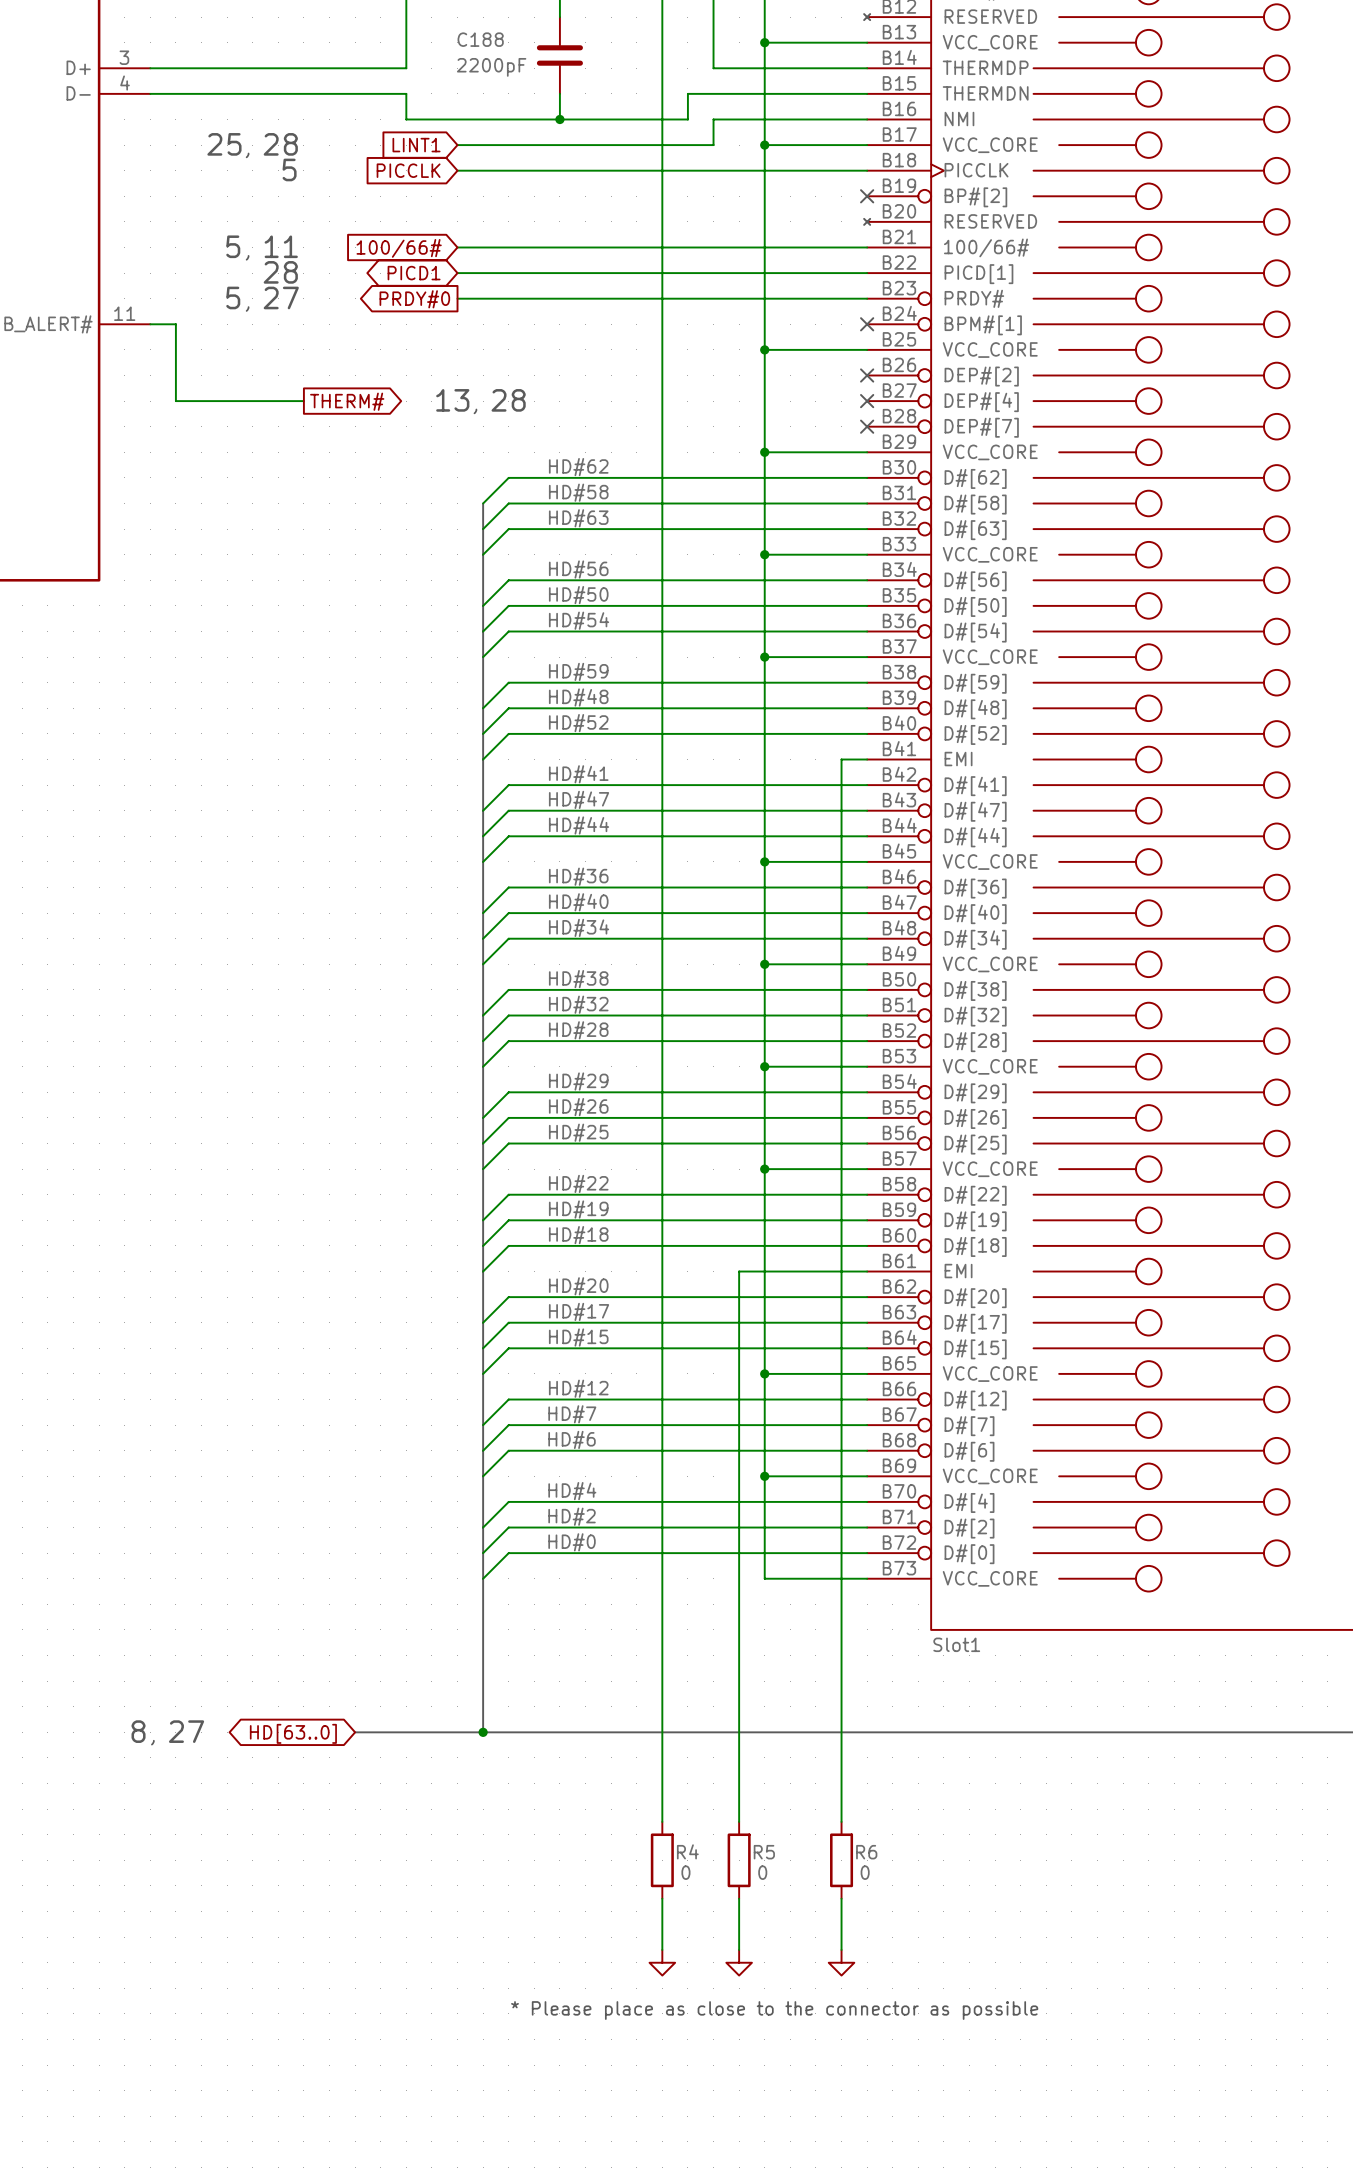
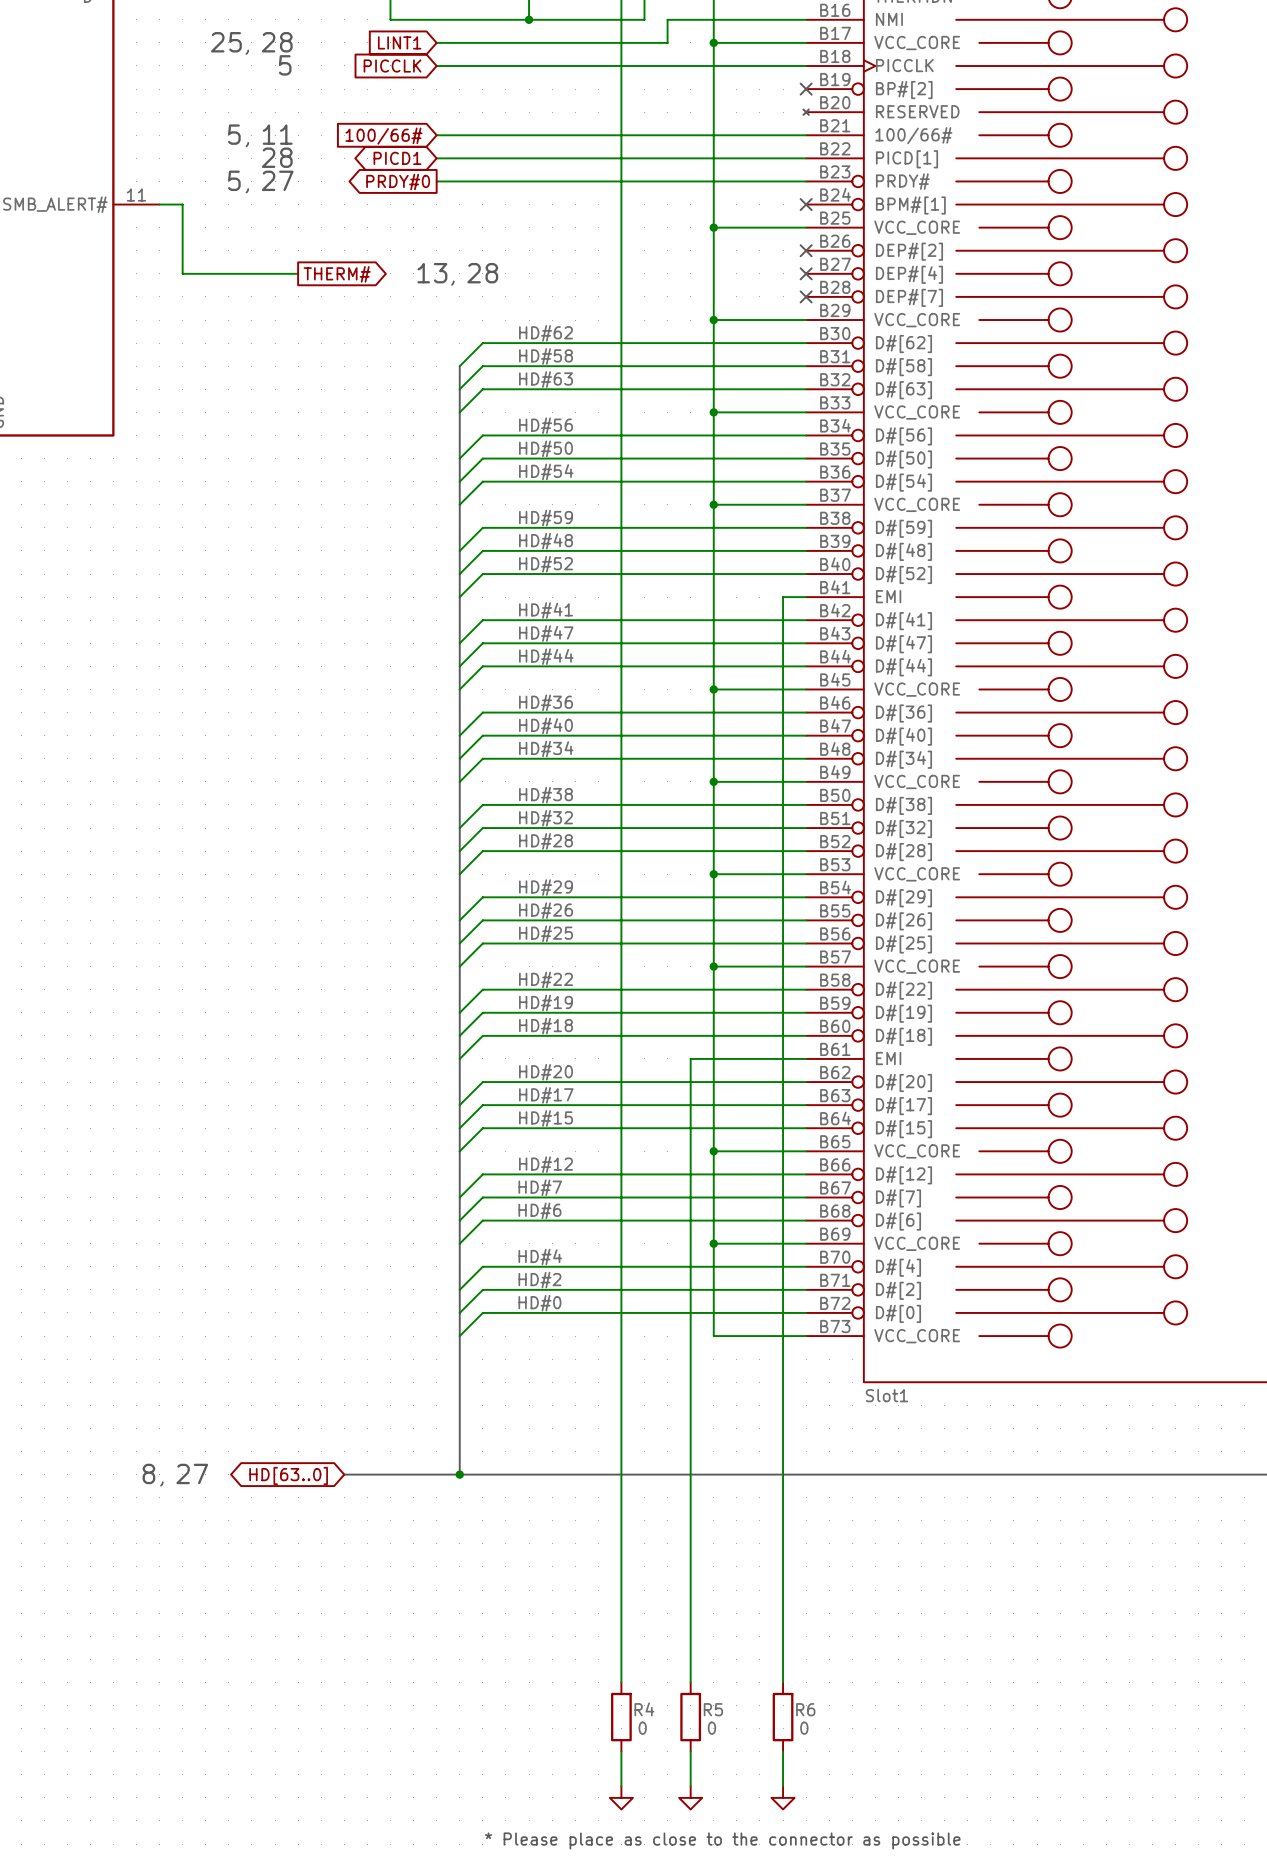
wire: none -> (621, 1555) (621, 1624)
wire: none -> (690, 1555) (690, 1624)
wire: none -> (783, 1555) (783, 1624)
R4 position: (662, 1860) -> (621, 1717)
R5 position: (739, 1860) -> (690, 1717)
R6 position: (841, 1860) -> (783, 1717)
power symbol: (662, 1962) -> none
power symbol: (739, 1962) -> none
power symbol: (841, 1962) -> none
text position: * Please place as close to the connector as possible (774, 2010) -> * Please place as close to the connector as possible (722, 1840)
wire: none -> (621, 1751) (621, 1786)
wire: none -> (690, 1751) (690, 1786)
wire: none -> (783, 1751) (783, 1786)
power symbol: none -> (621, 1797)
power symbol: none -> (690, 1797)
power symbol: none -> (783, 1797)

